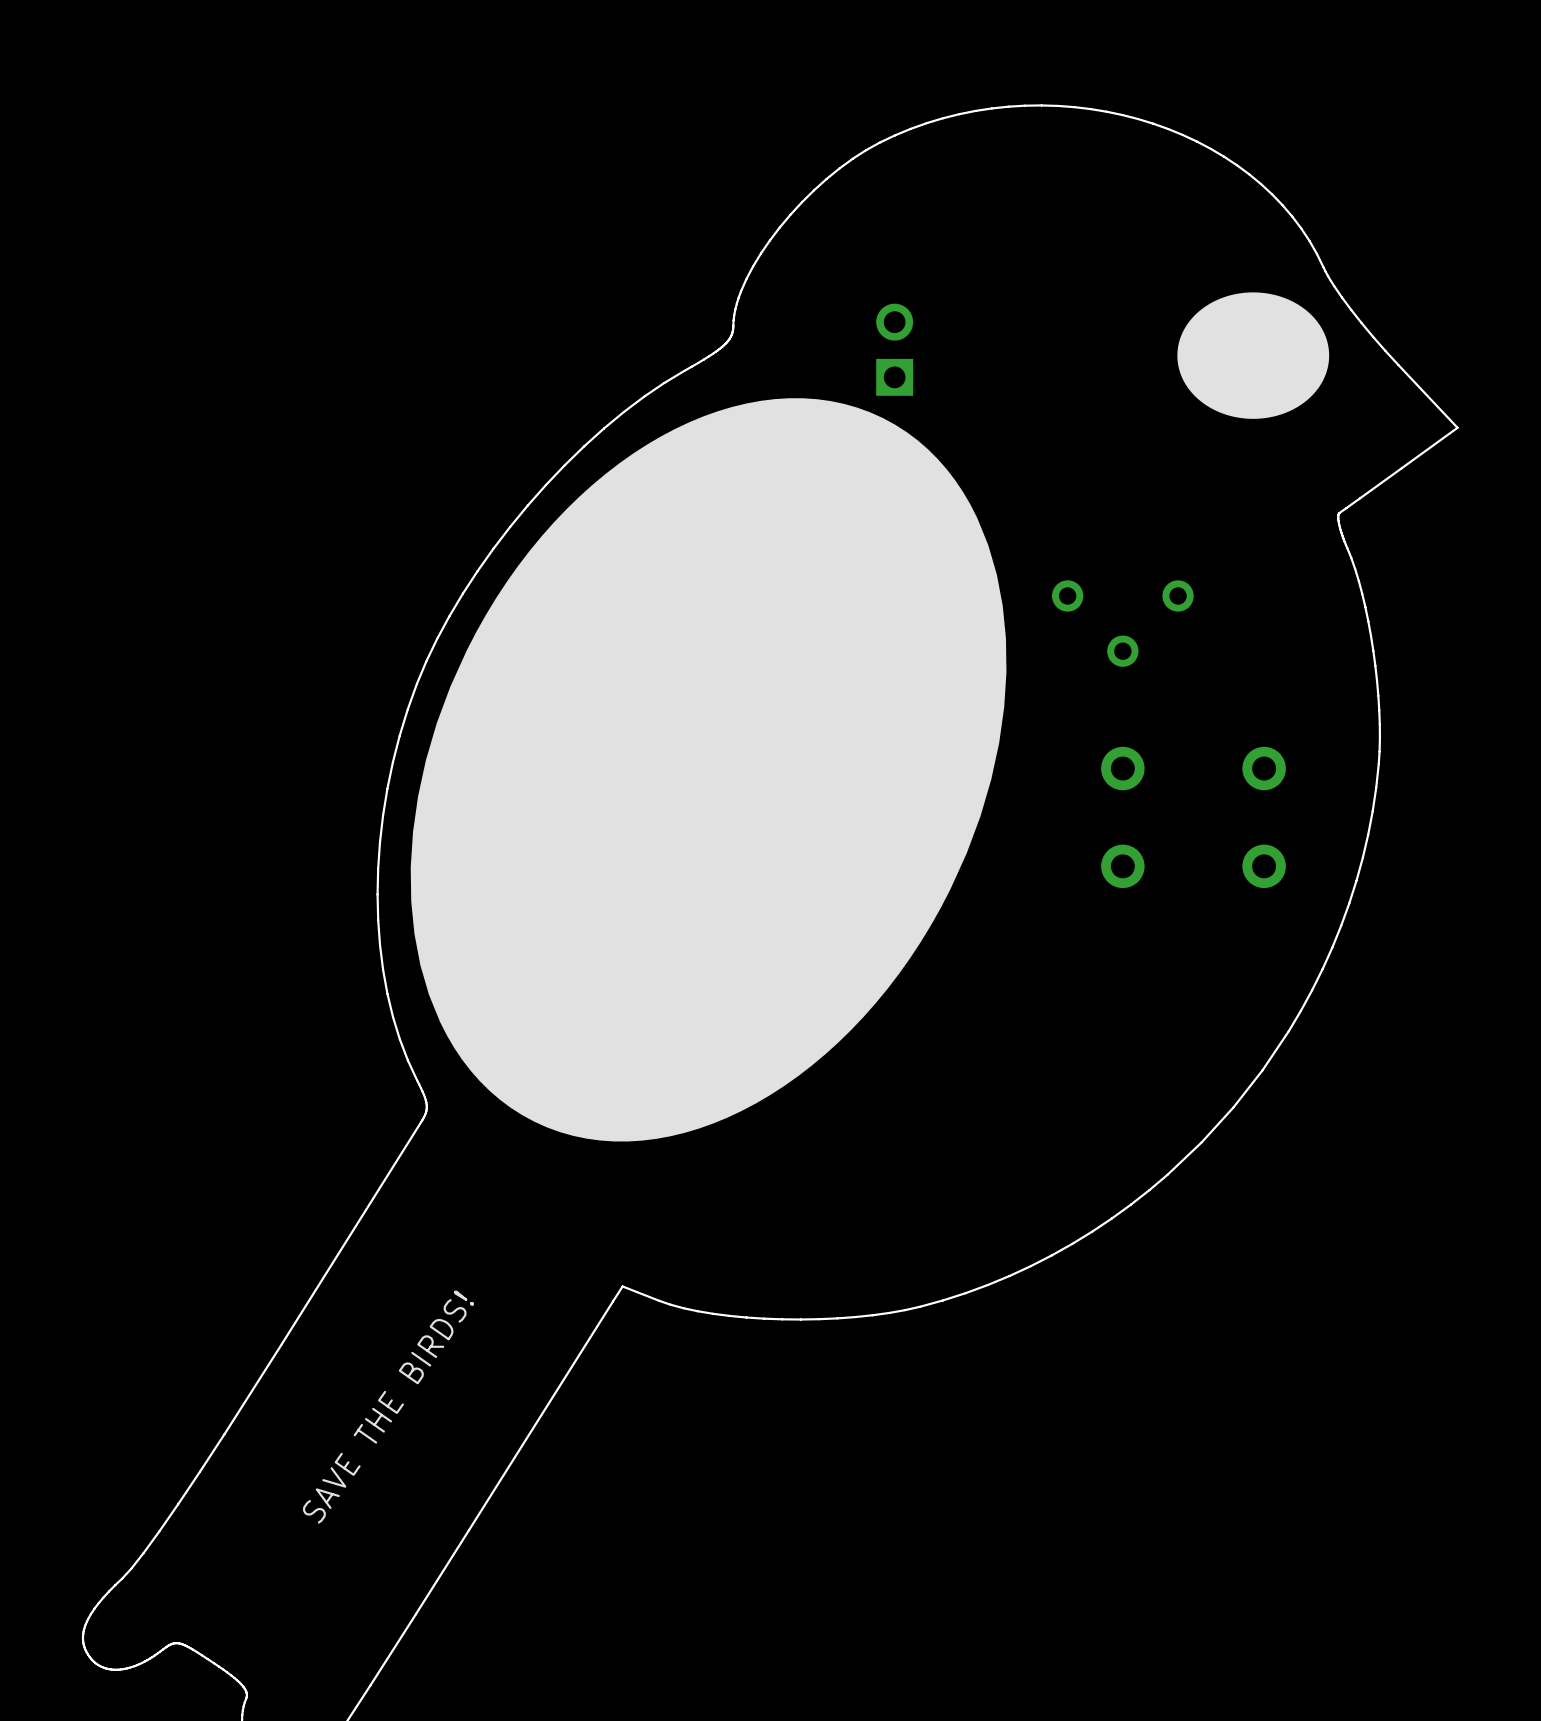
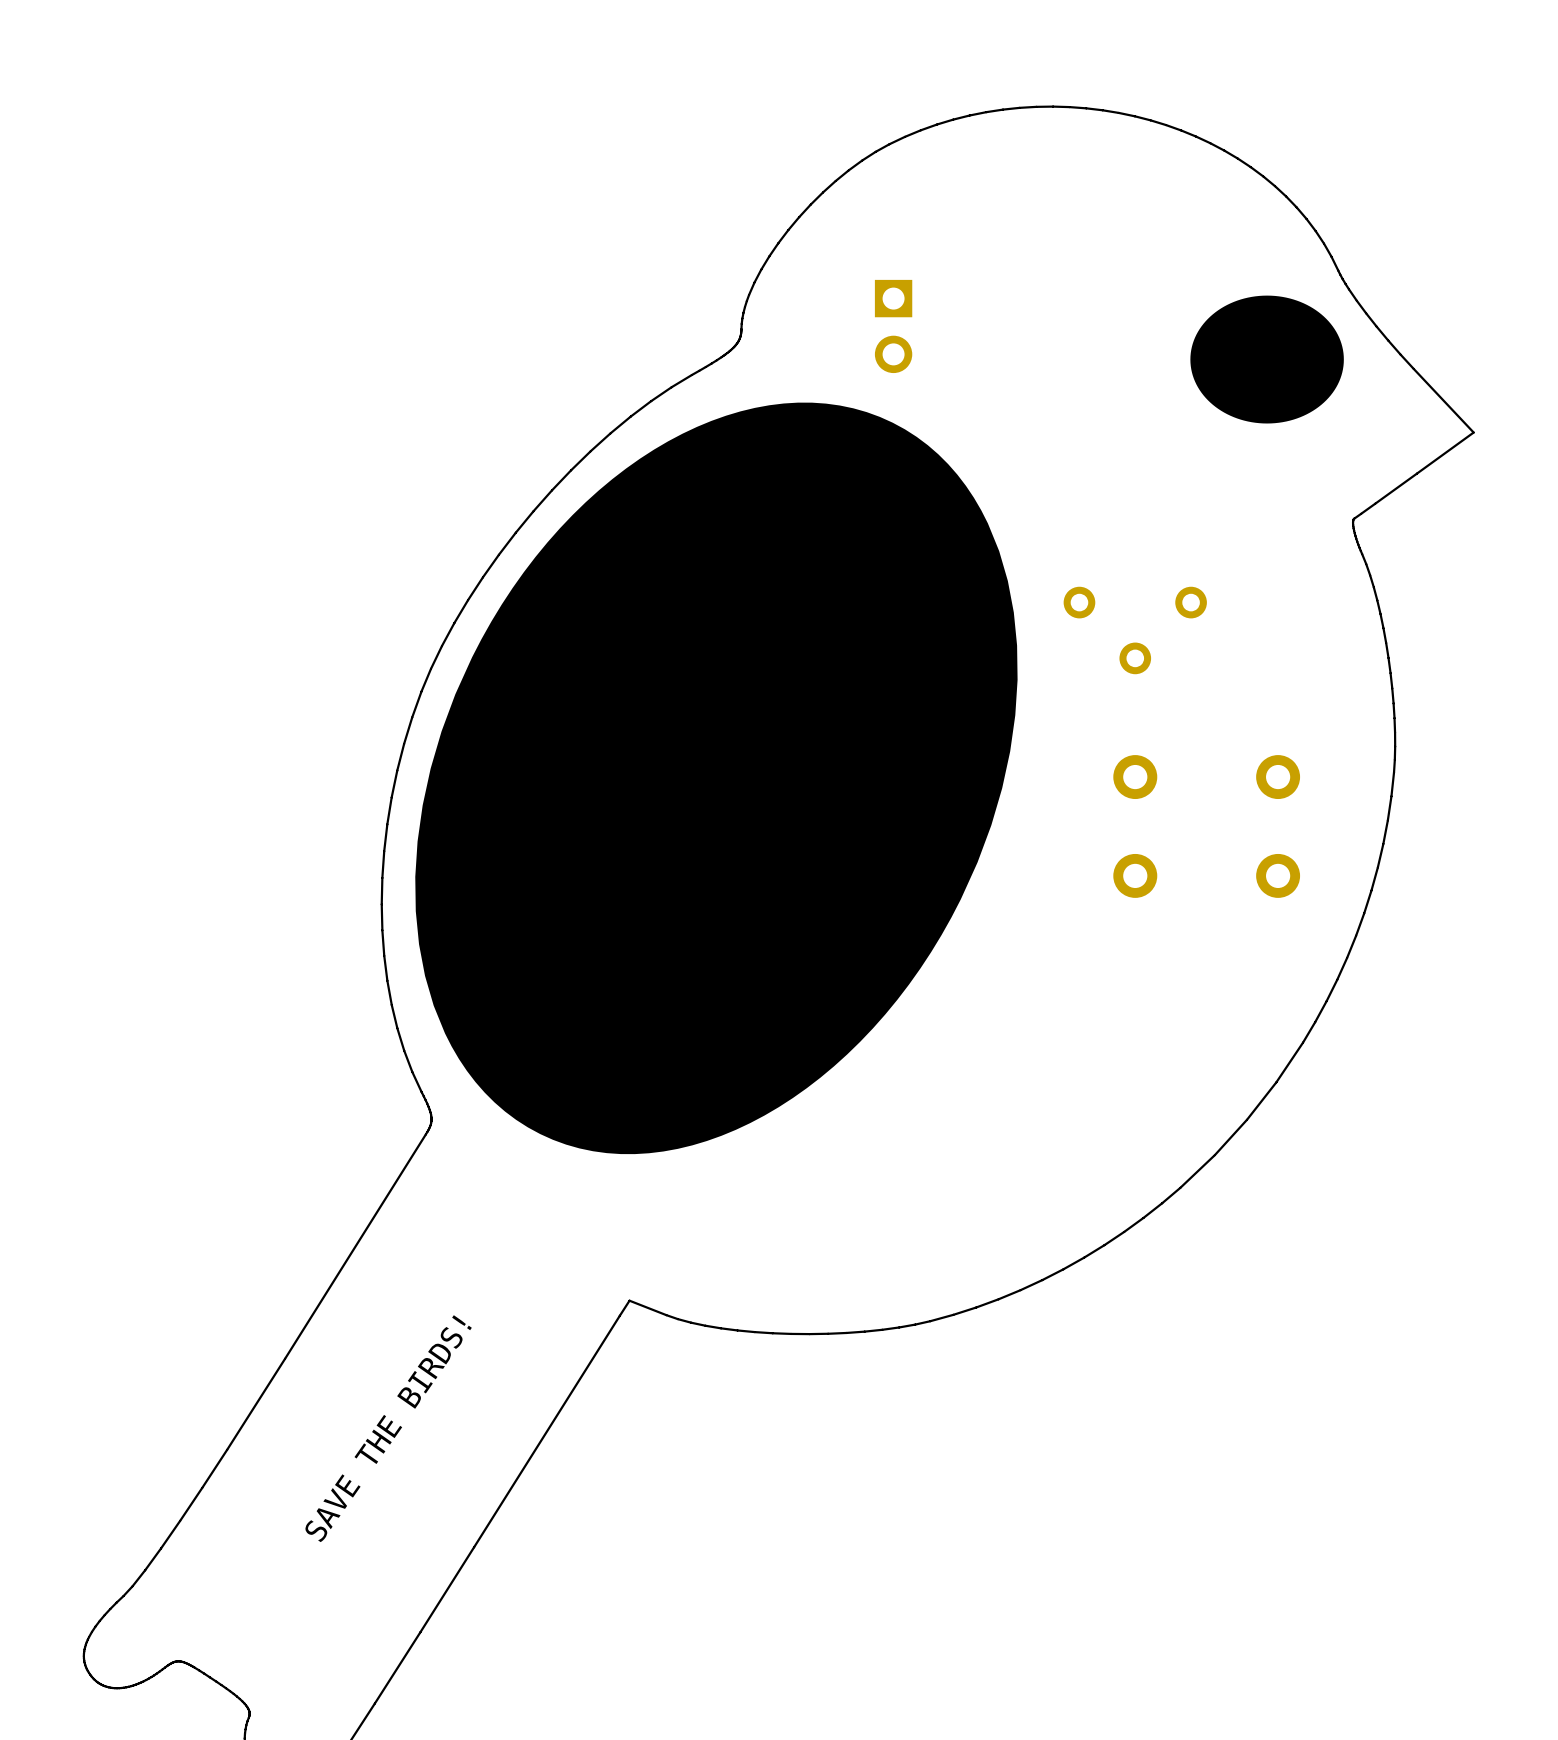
part rotation: 0° (894, 349) -> 180° (893, 326)

